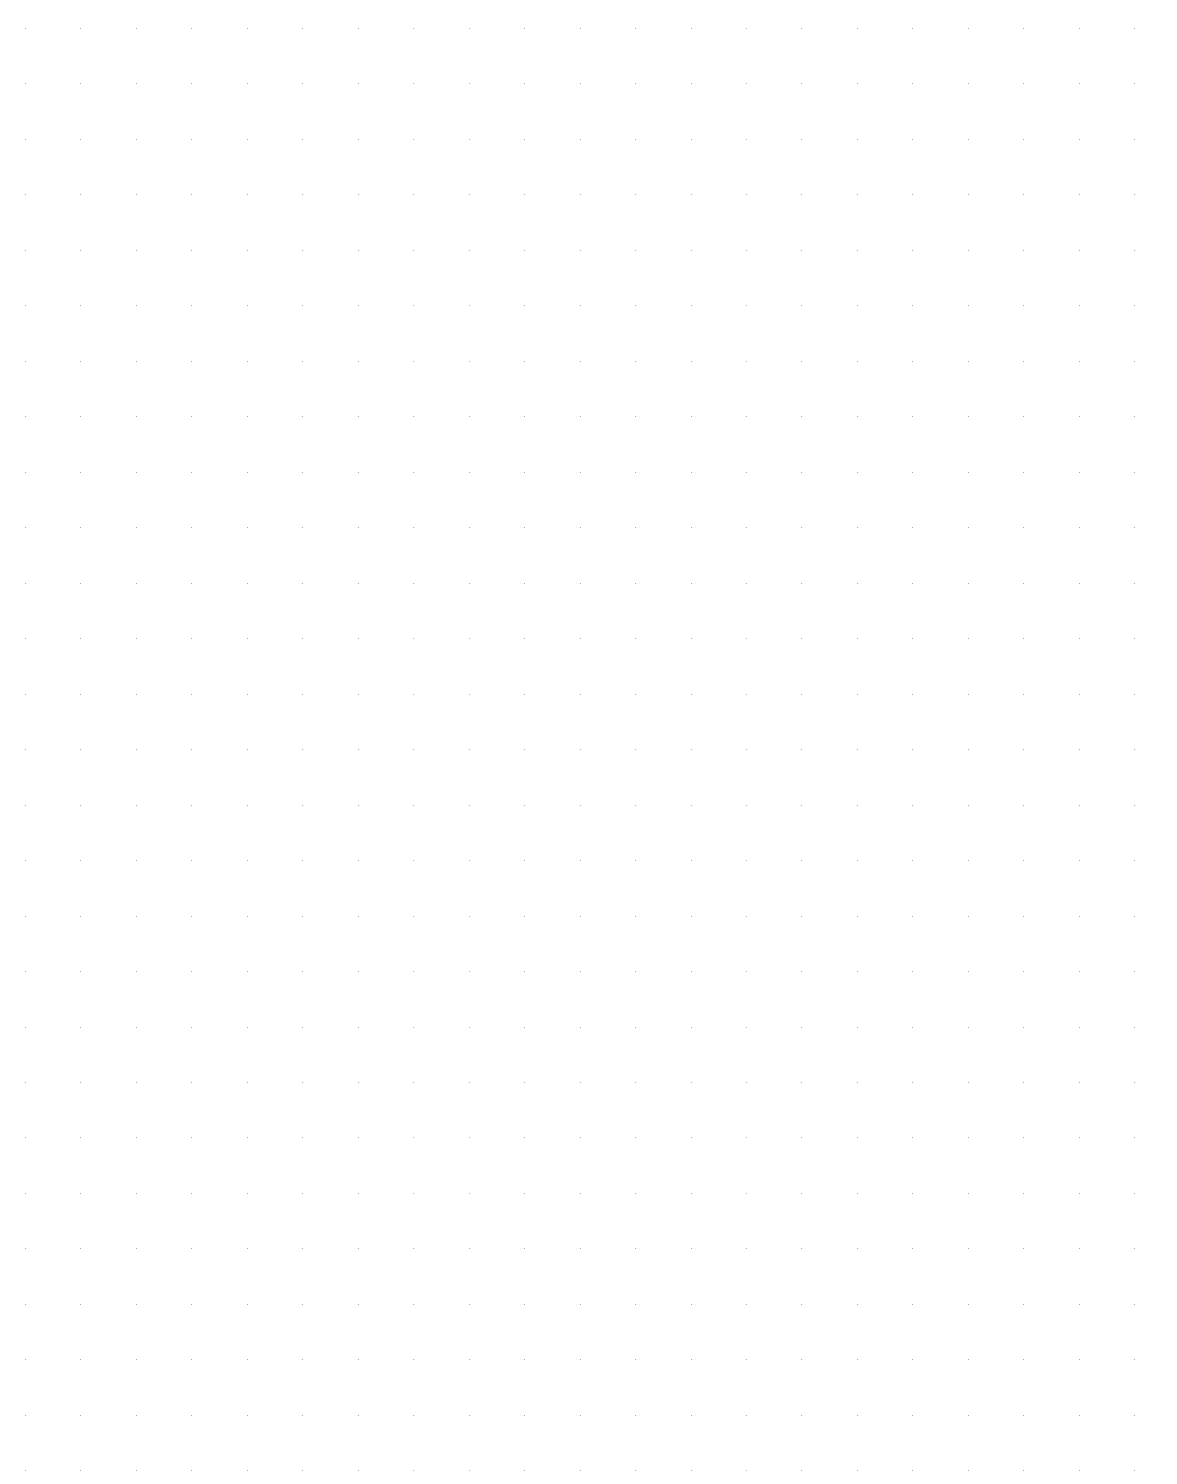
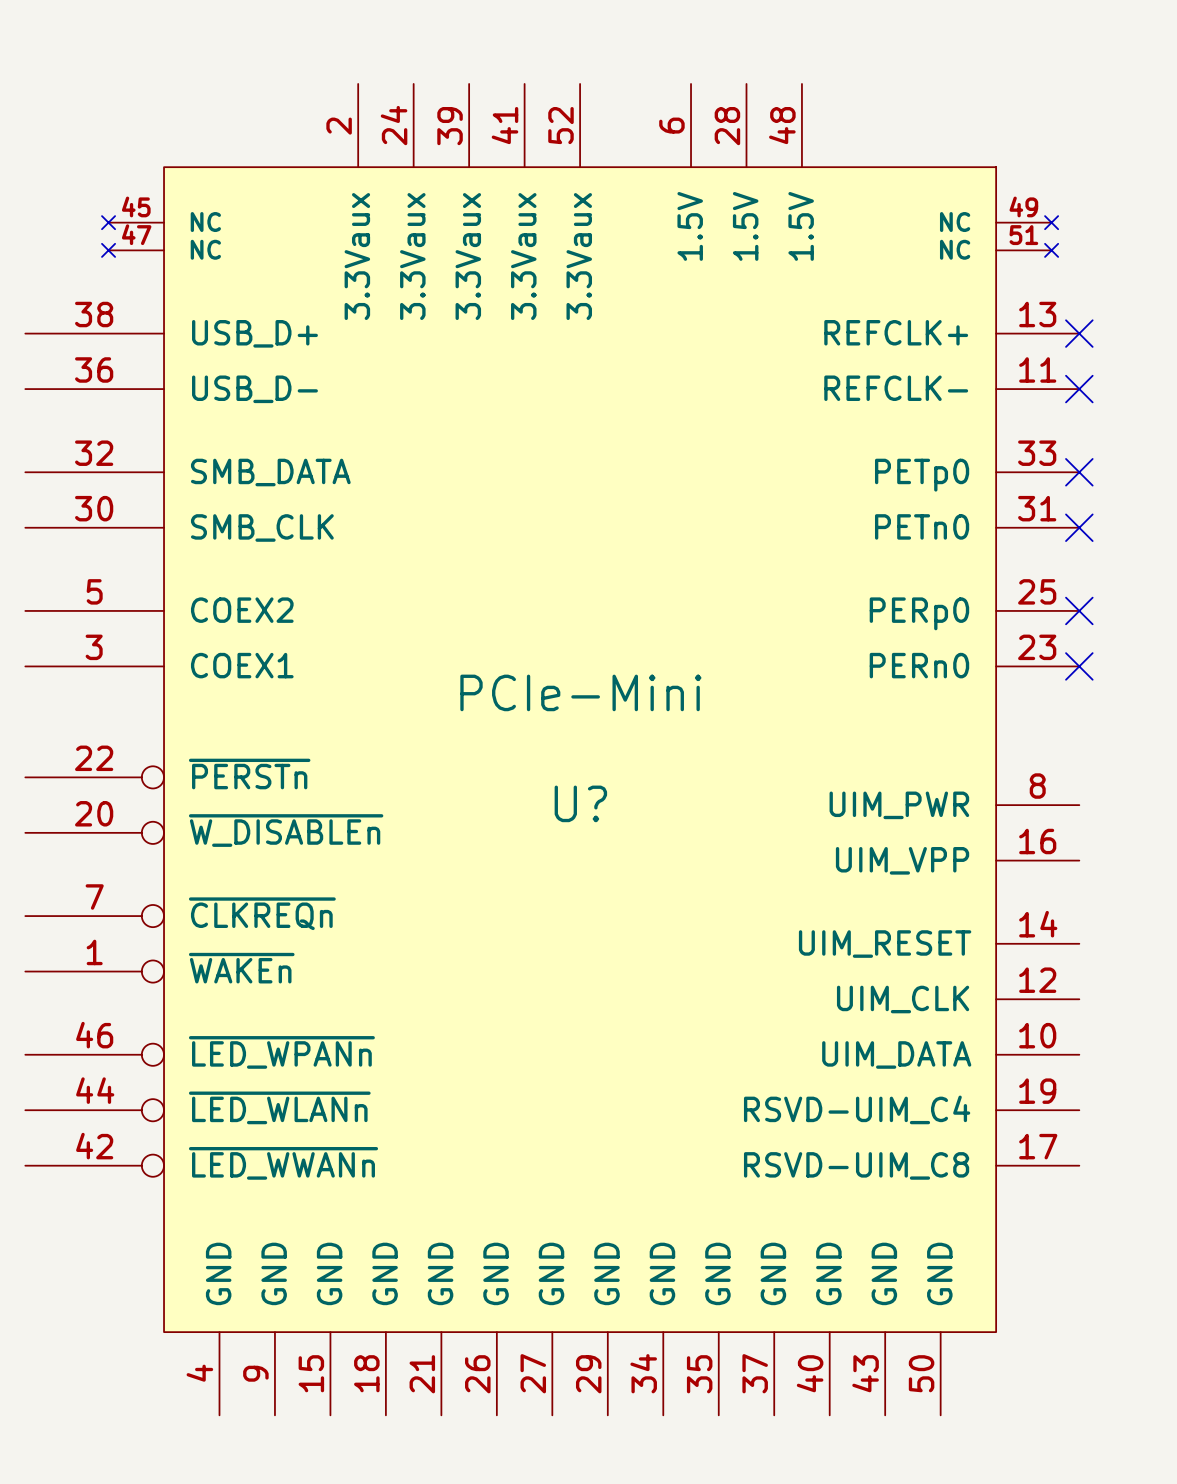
no-connect mark: none -> (1079, 333)
no-connect mark: none -> (1079, 389)
no-connect mark: none -> (1079, 472)
no-connect mark: none -> (1079, 527)
no-connect mark: none -> (1079, 610)
no-connect mark: none -> (1079, 666)
U?: none -> PCIe-Mini (552, 749)

